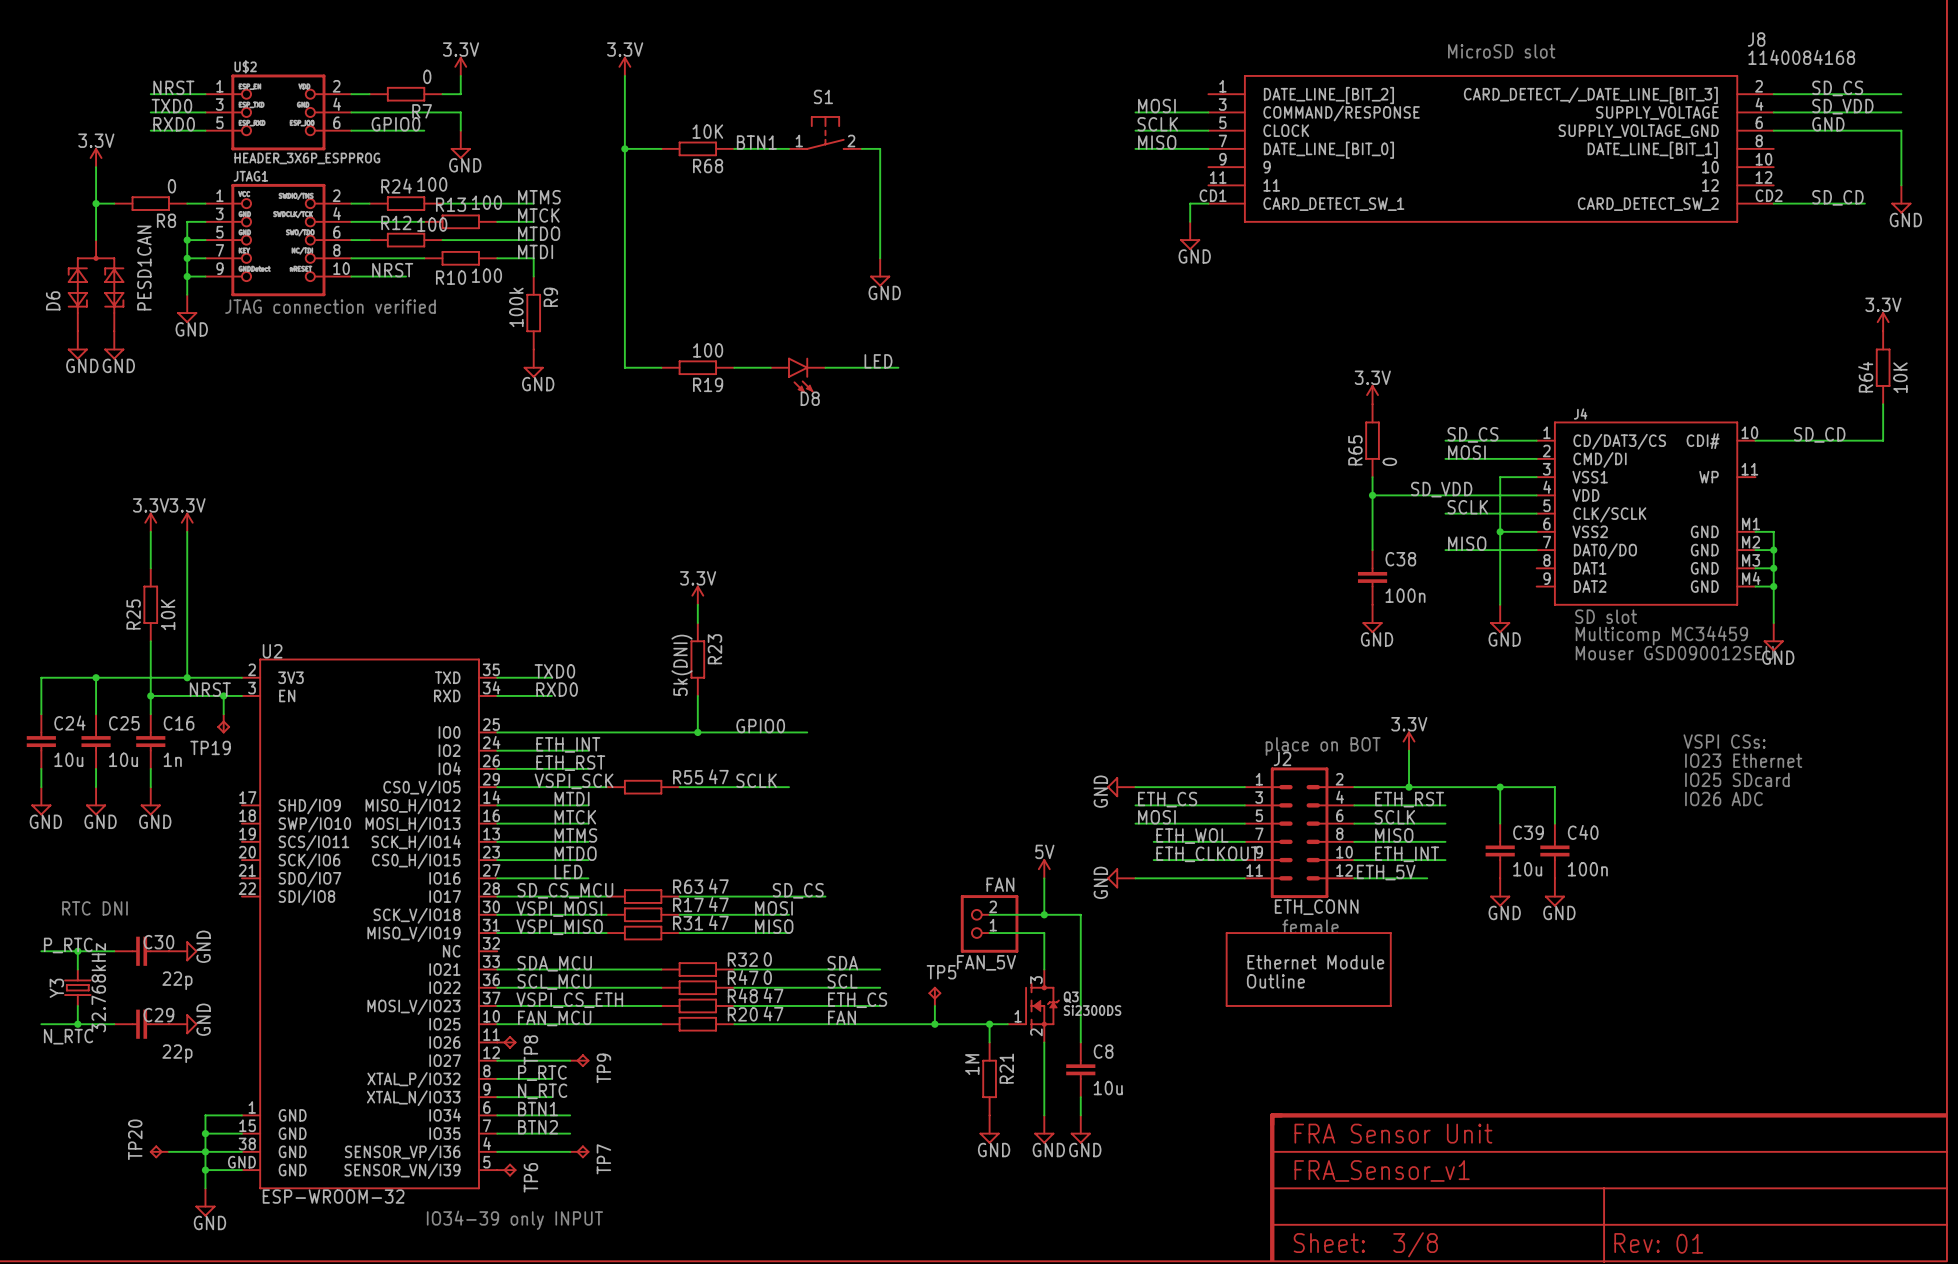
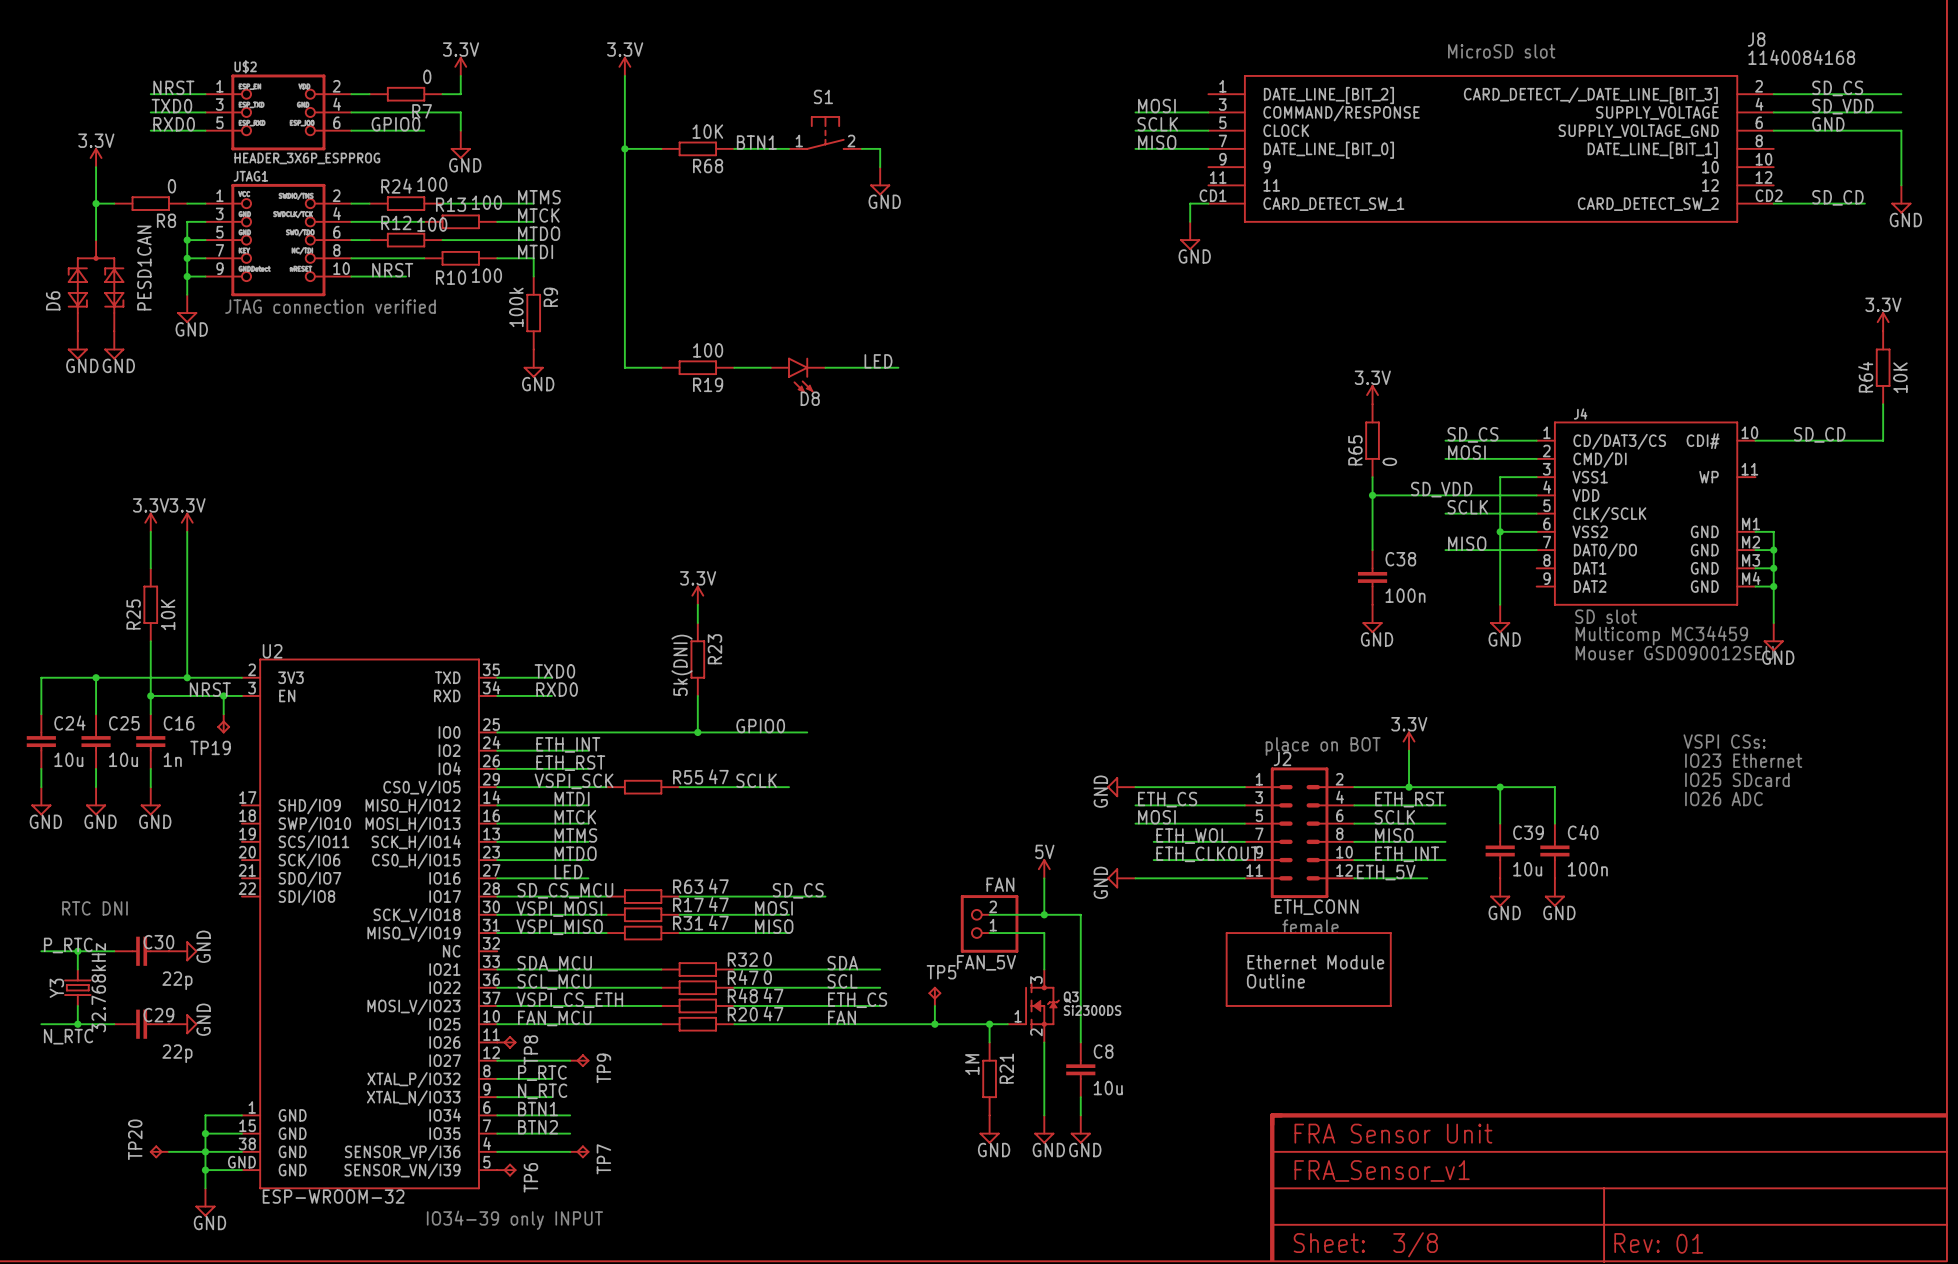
wire: (880, 167) (880, 258) -> none
power symbol position: GND (880, 272) -> GND (880, 181)

